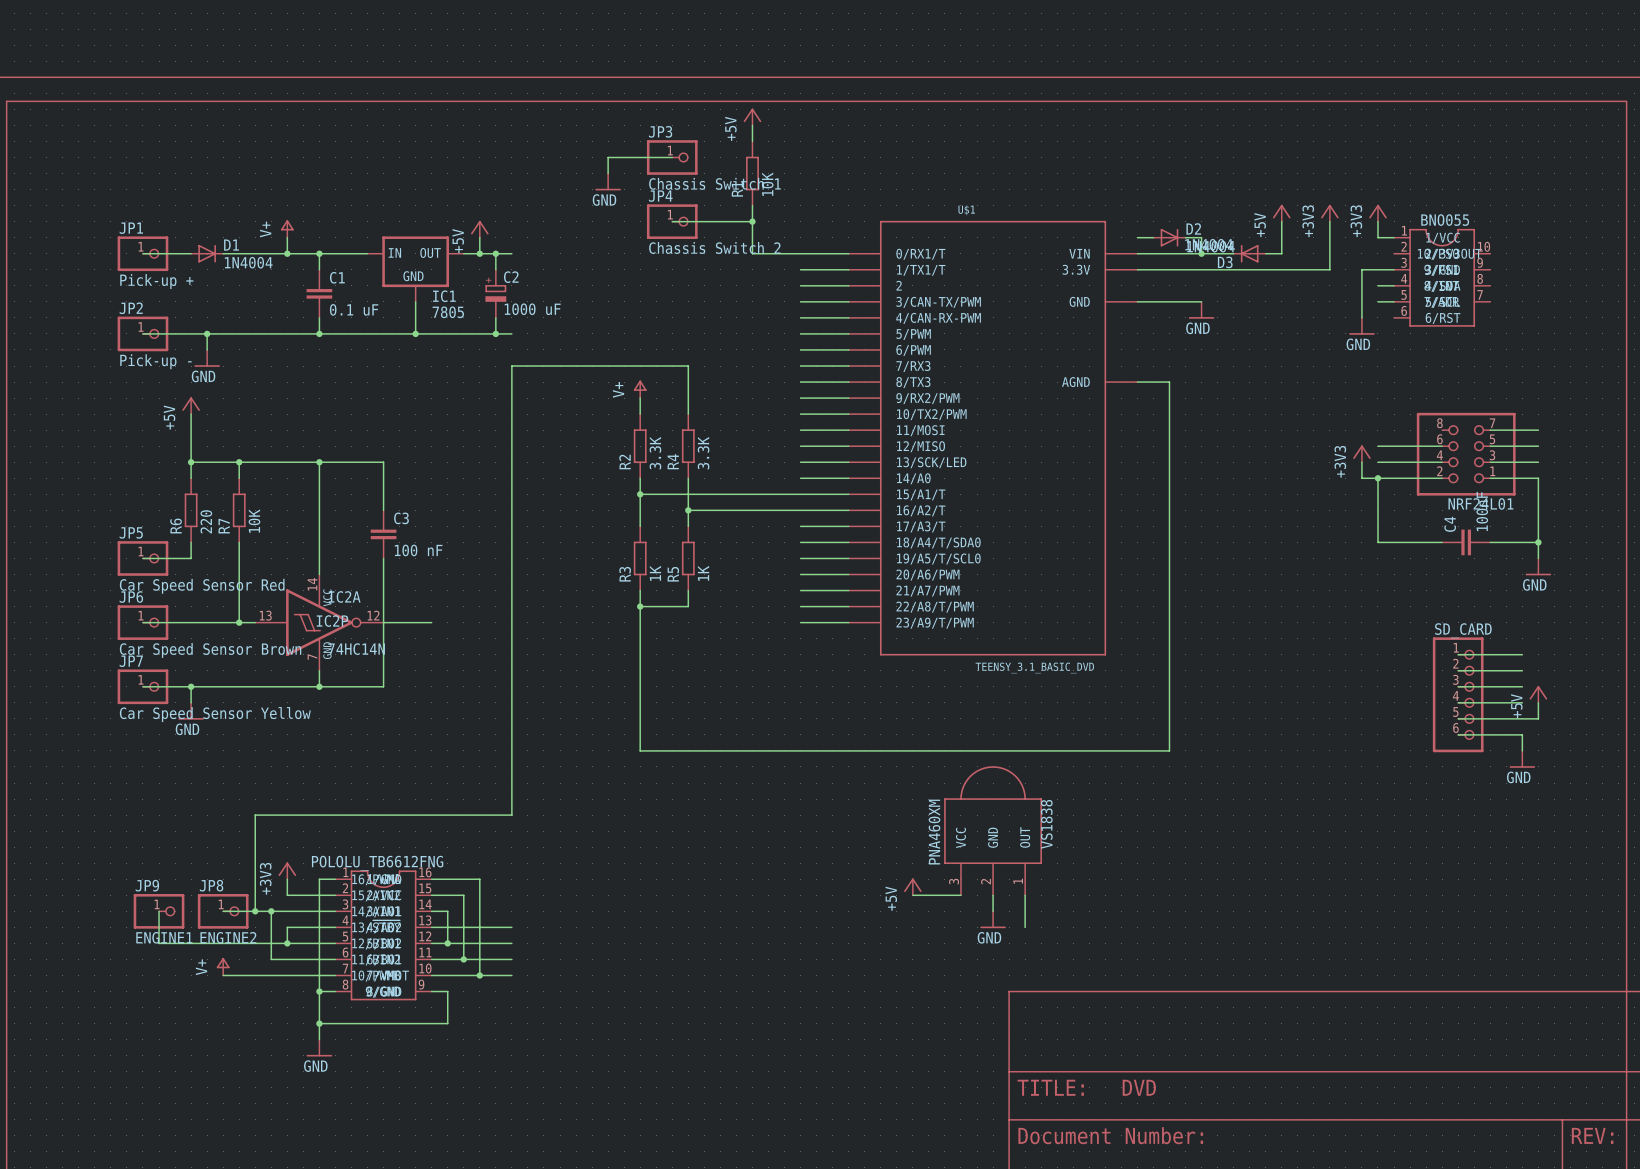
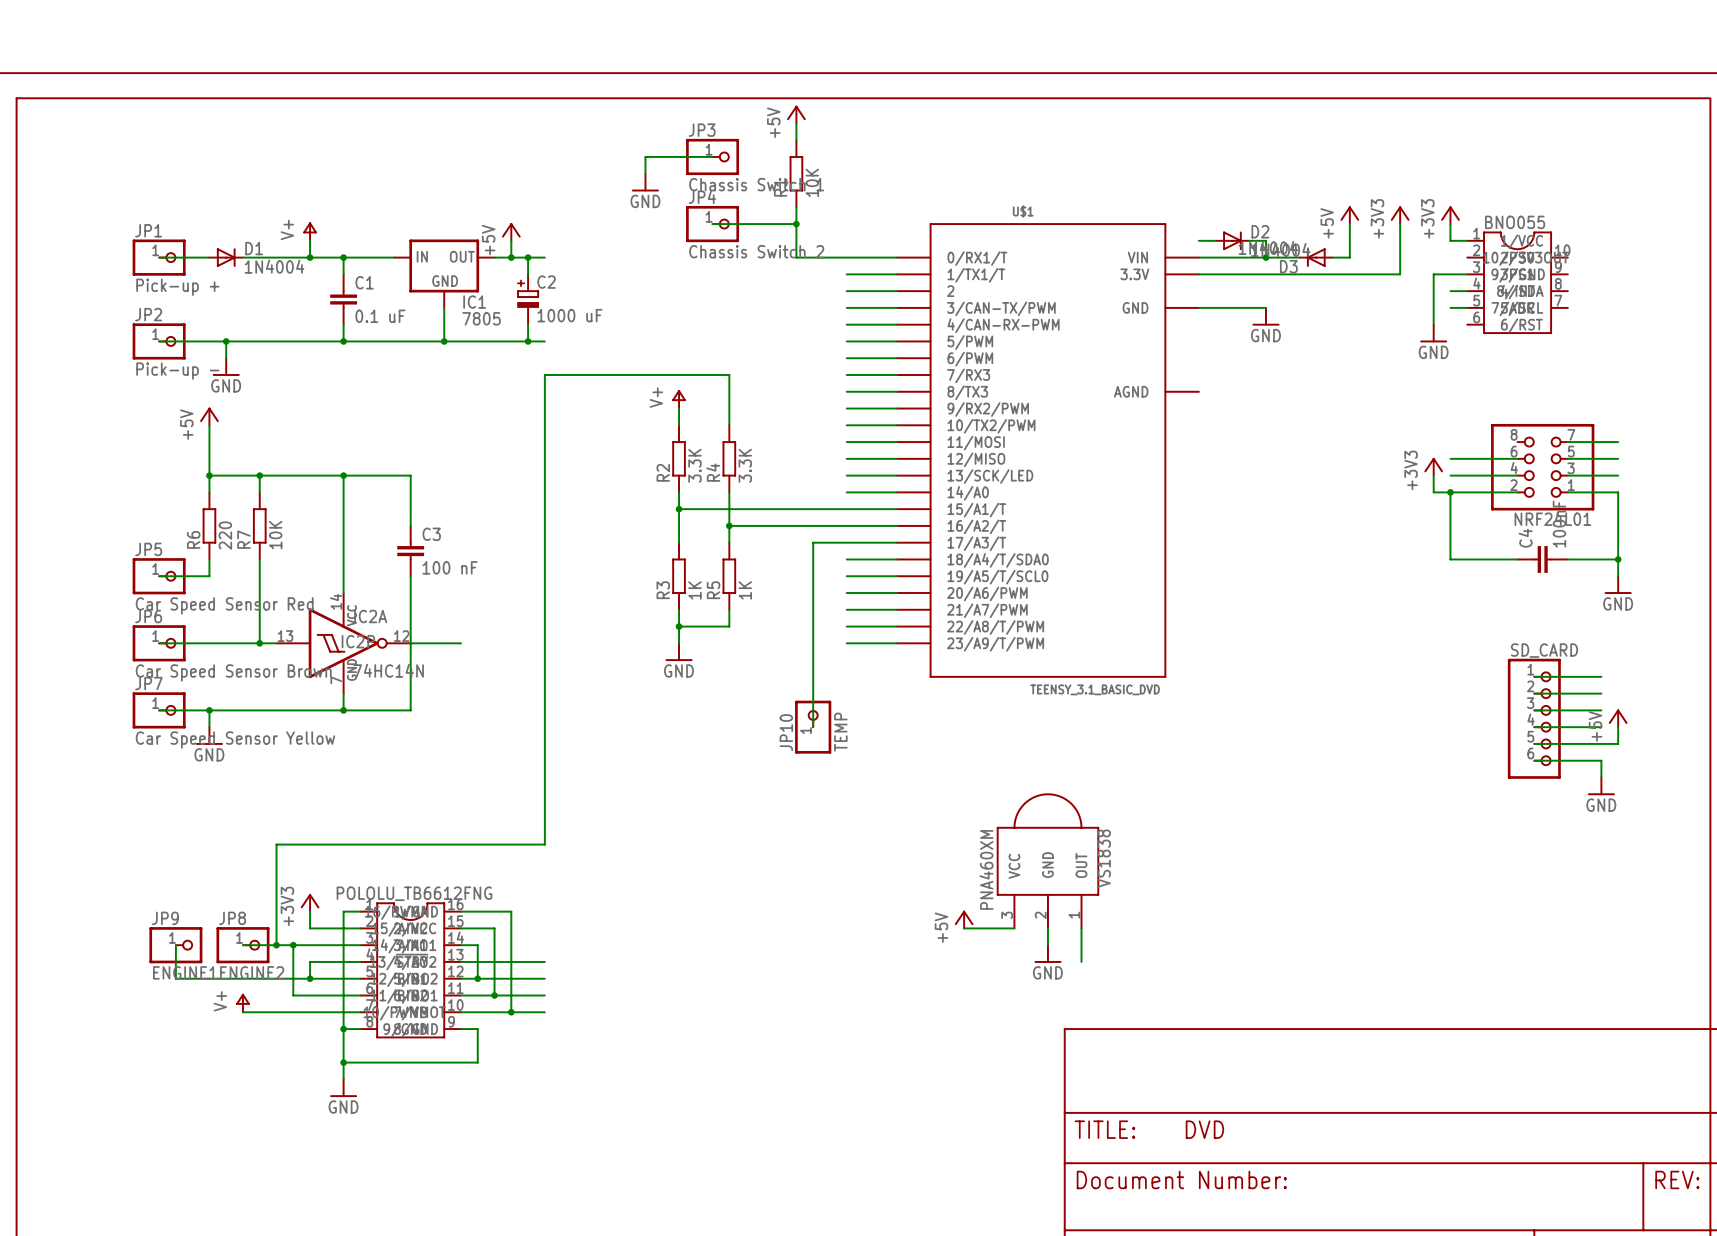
wire: (1137, 382) (1169, 382) (1169, 750) (640, 750) (640, 622) -> none
wire: none -> (846, 542) (813, 542) (813, 727)
power symbol: none -> GND (679, 652)
JP10: none -> TEMP (813, 727)

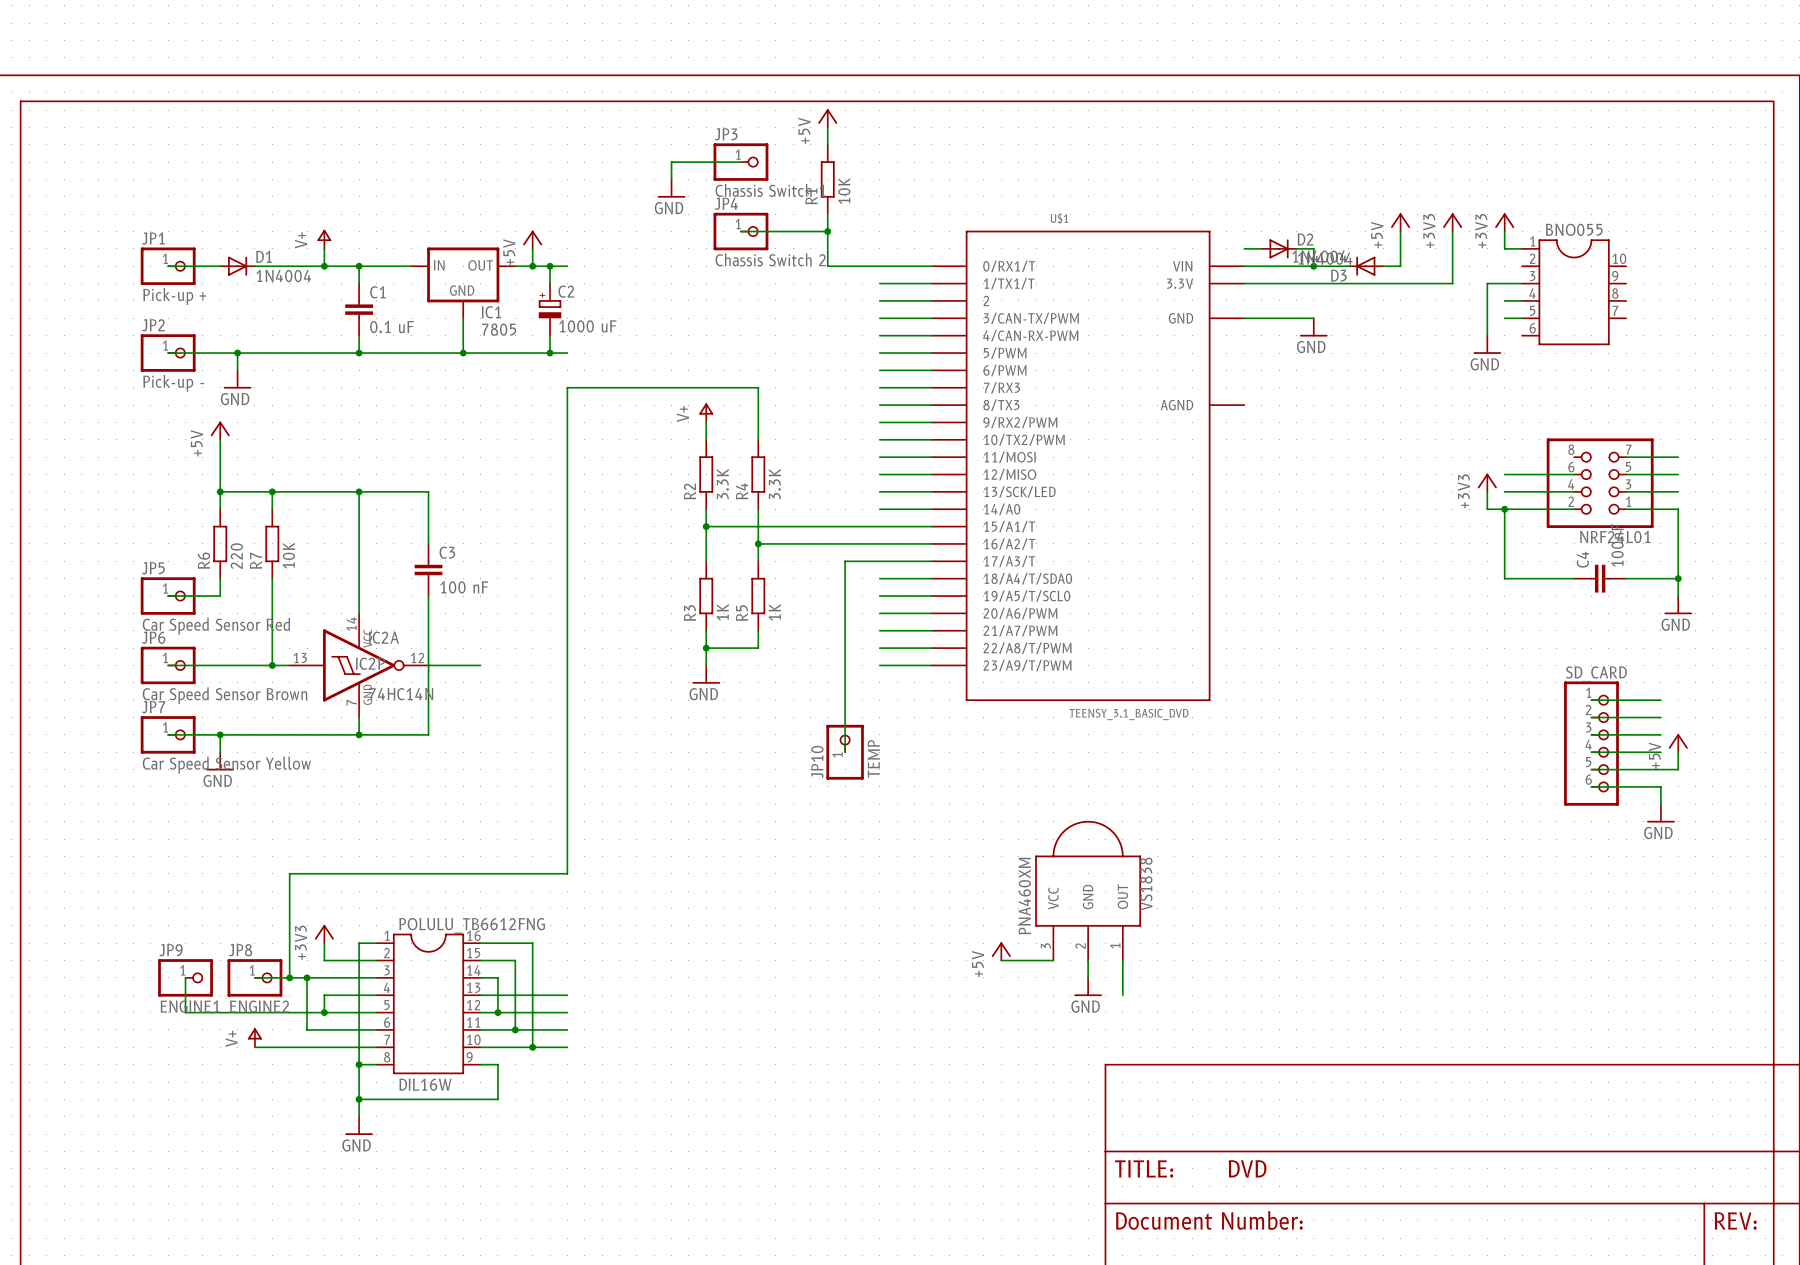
BNO055 symbol: [1467, 231, 1568, 334] -> [1522, 239, 1627, 346]
POLULU_TB6612FNG name: none -> POLULU_TB6612FNG (472, 925)
POLULU_TB6612FNG symbol: [360, 902, 462, 1039] -> [376, 933, 481, 1075]
POLULU_TB6612FNG value: none -> DIL16W (425, 1084)

